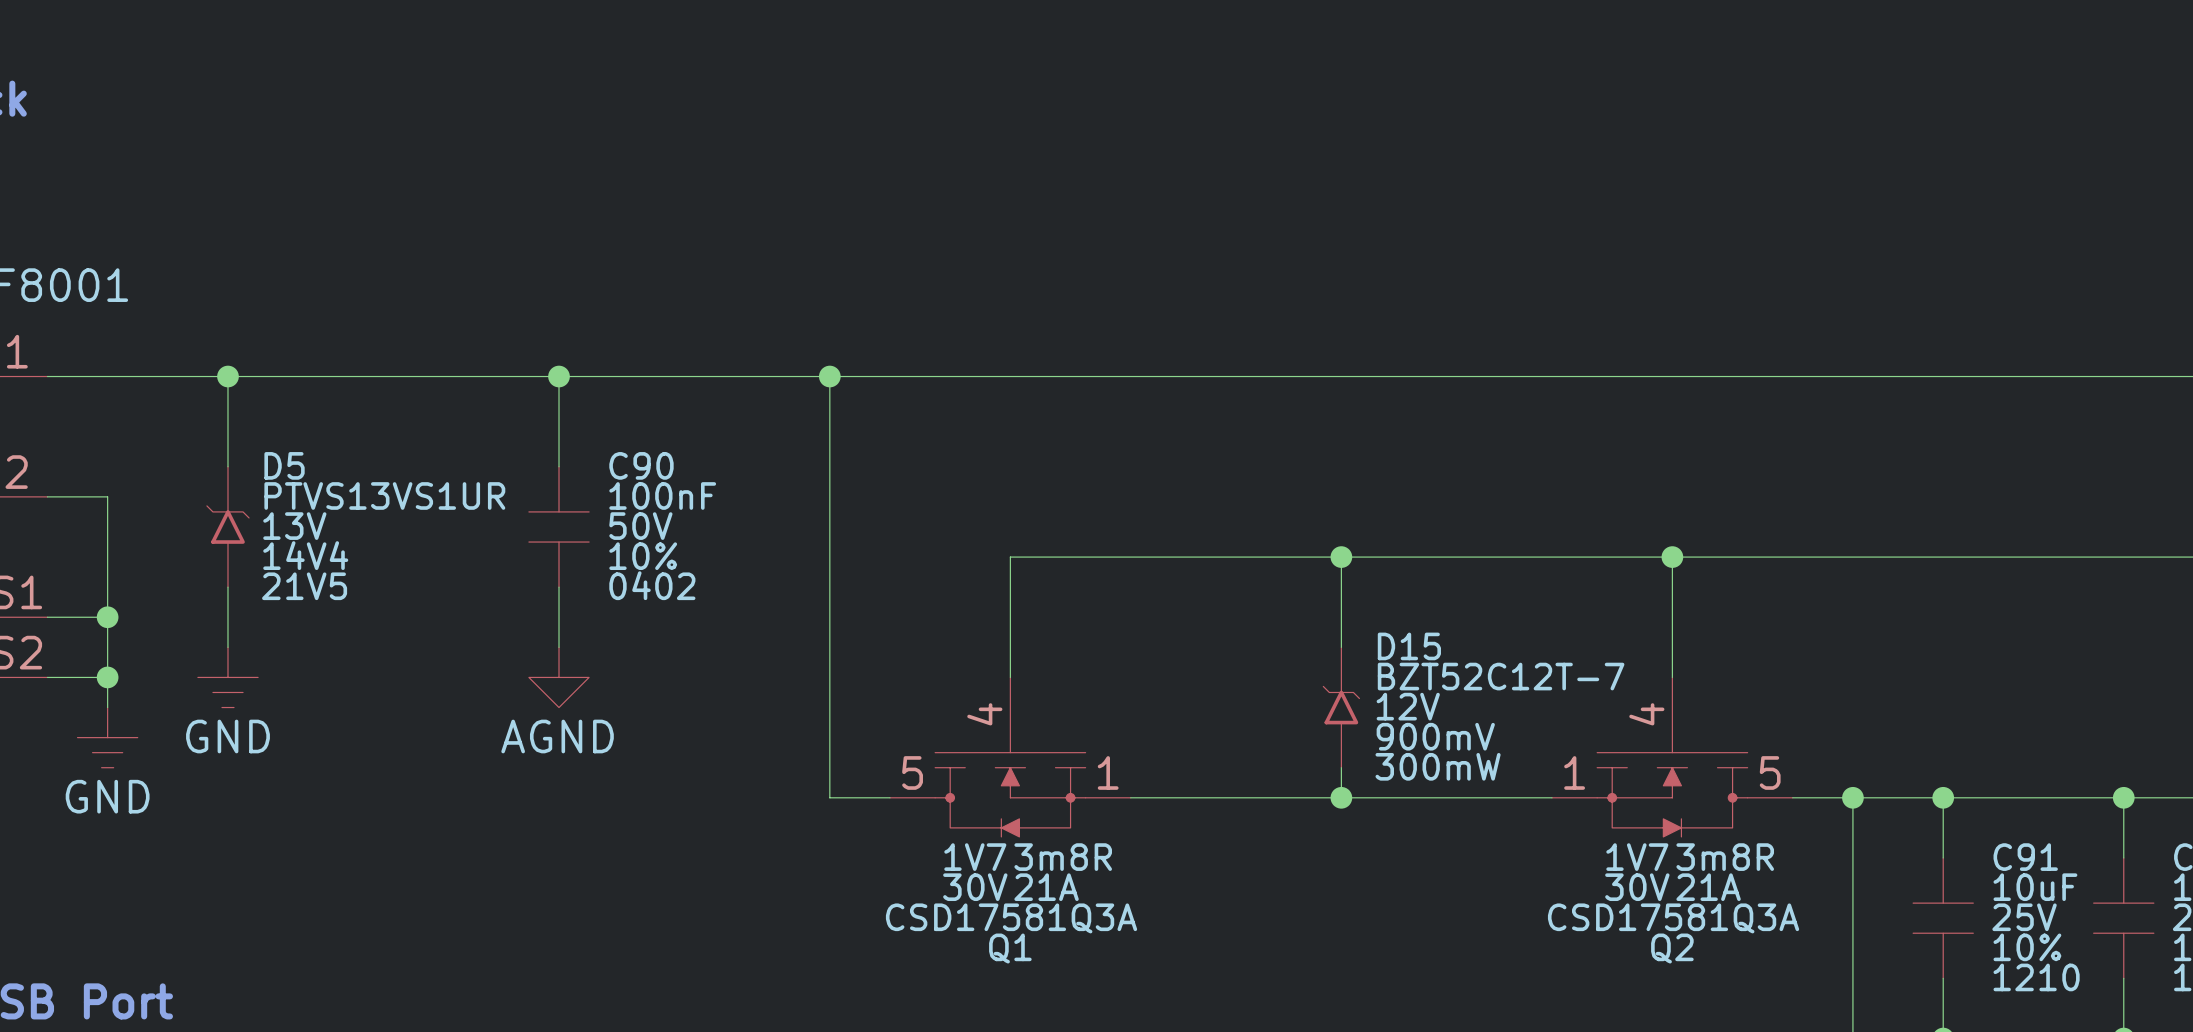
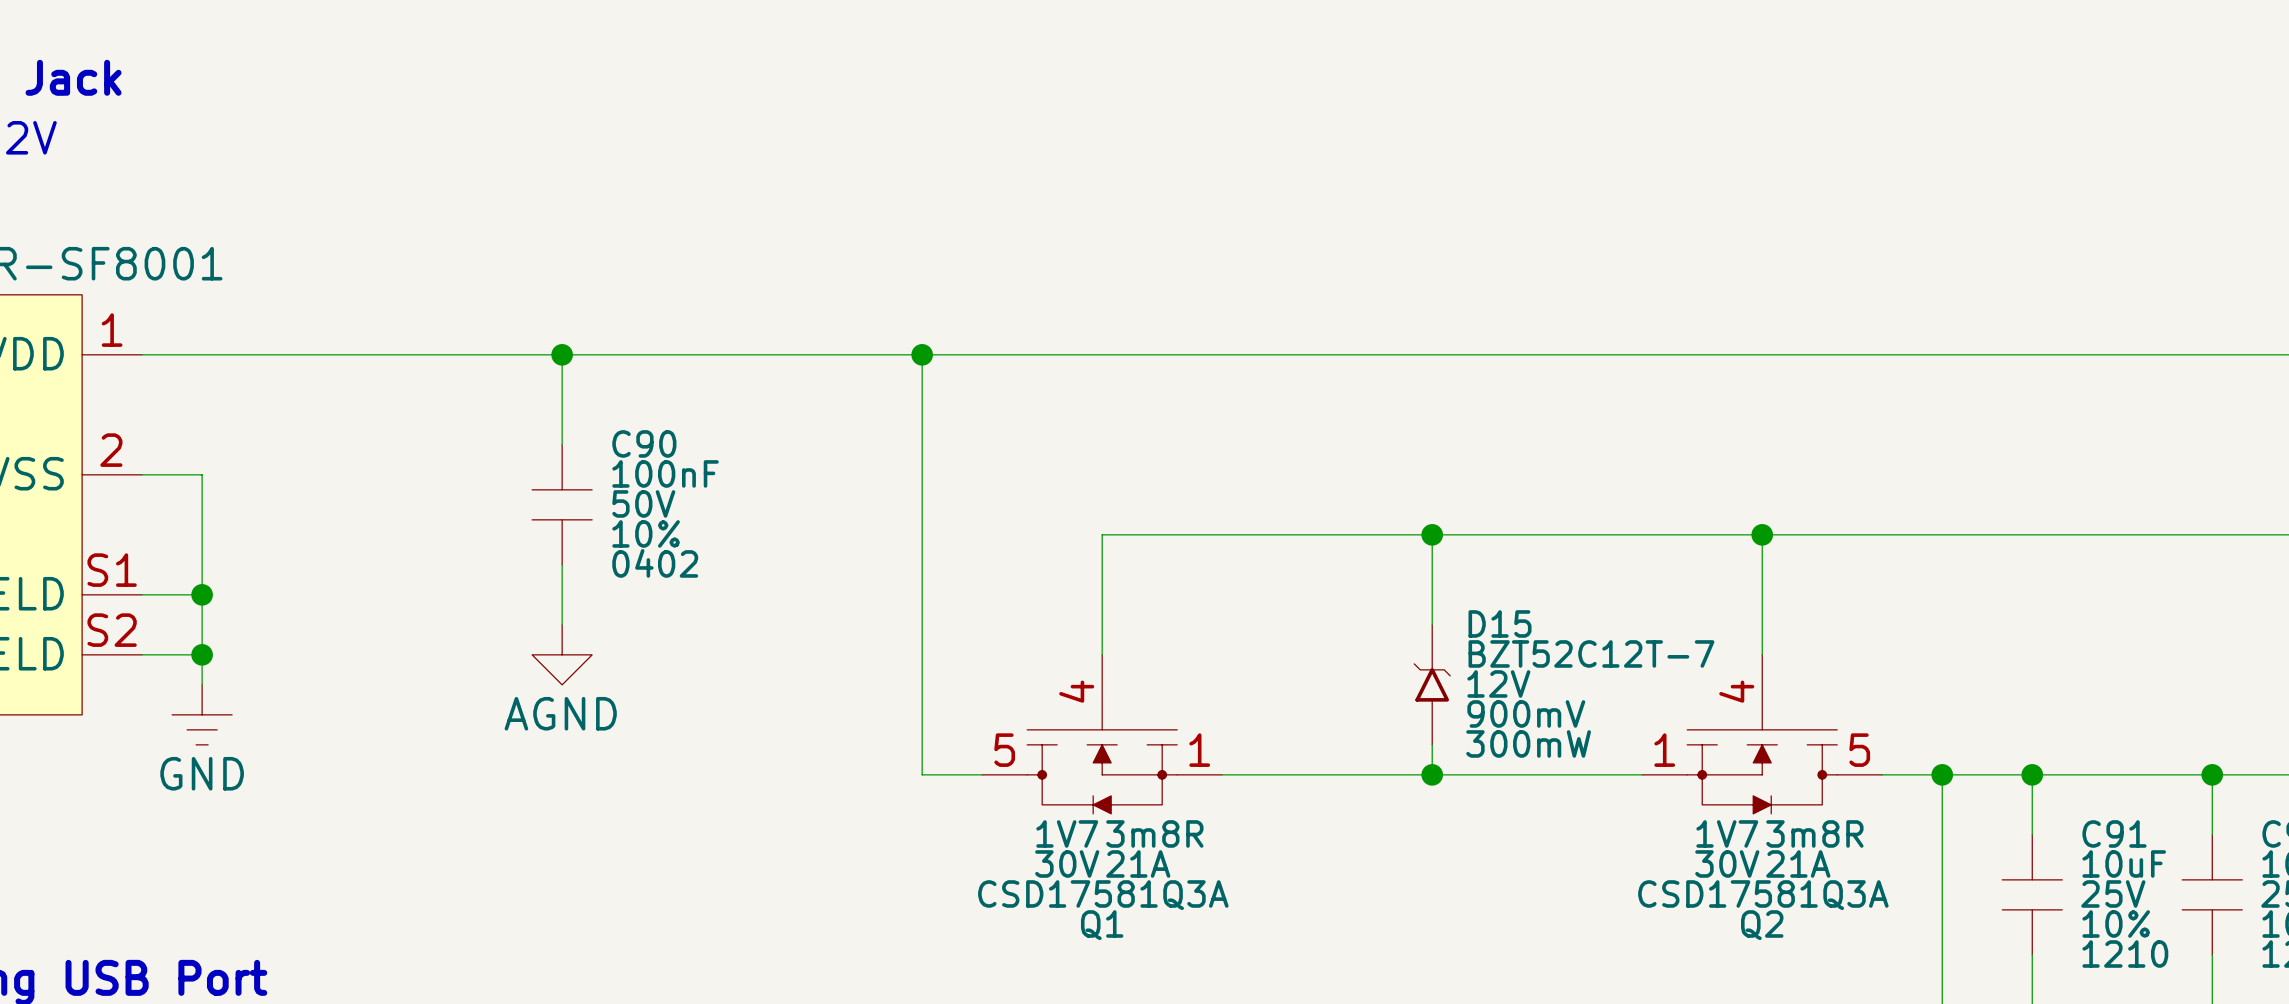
wire: (227, 376) (227, 466) -> none
junction: (227, 376) -> none
wire: (559, 376) (559, 466) -> (562, 354) (562, 444)
junction position: (559, 376) -> (562, 354)
D5: PTVS13VS1UR (227, 526) -> none
C90 position: (559, 526) -> (562, 504)
wire: (227, 587) (227, 647) -> none
wire: (559, 587) (559, 647) -> (562, 564) (562, 624)
power symbol: GND (227, 677) -> none
power symbol position: AGND (559, 677) -> AGND (562, 654)

